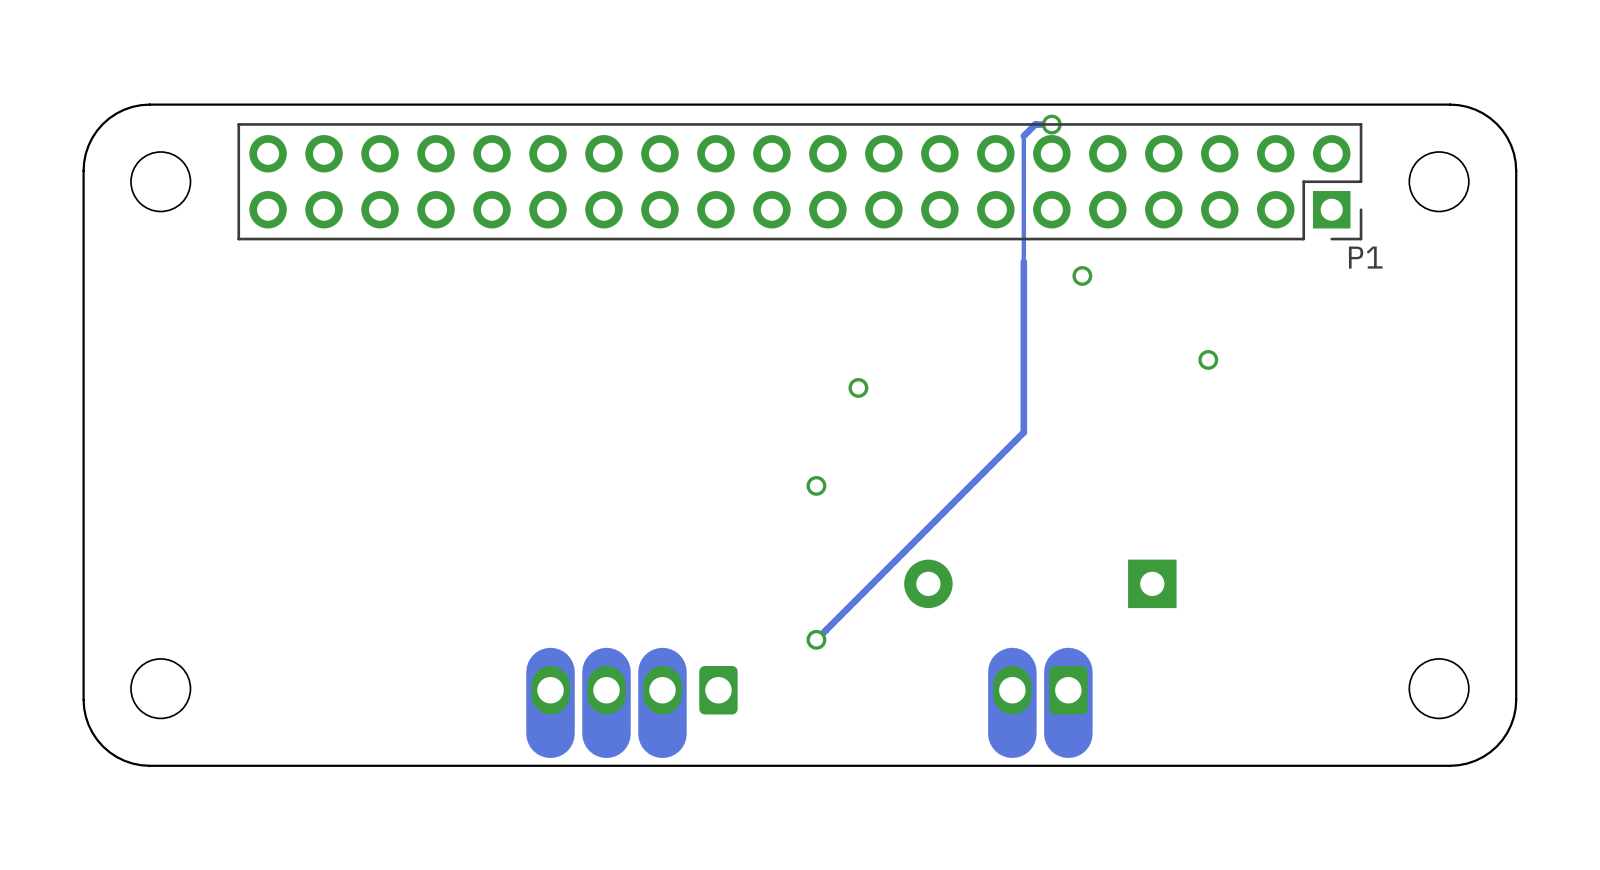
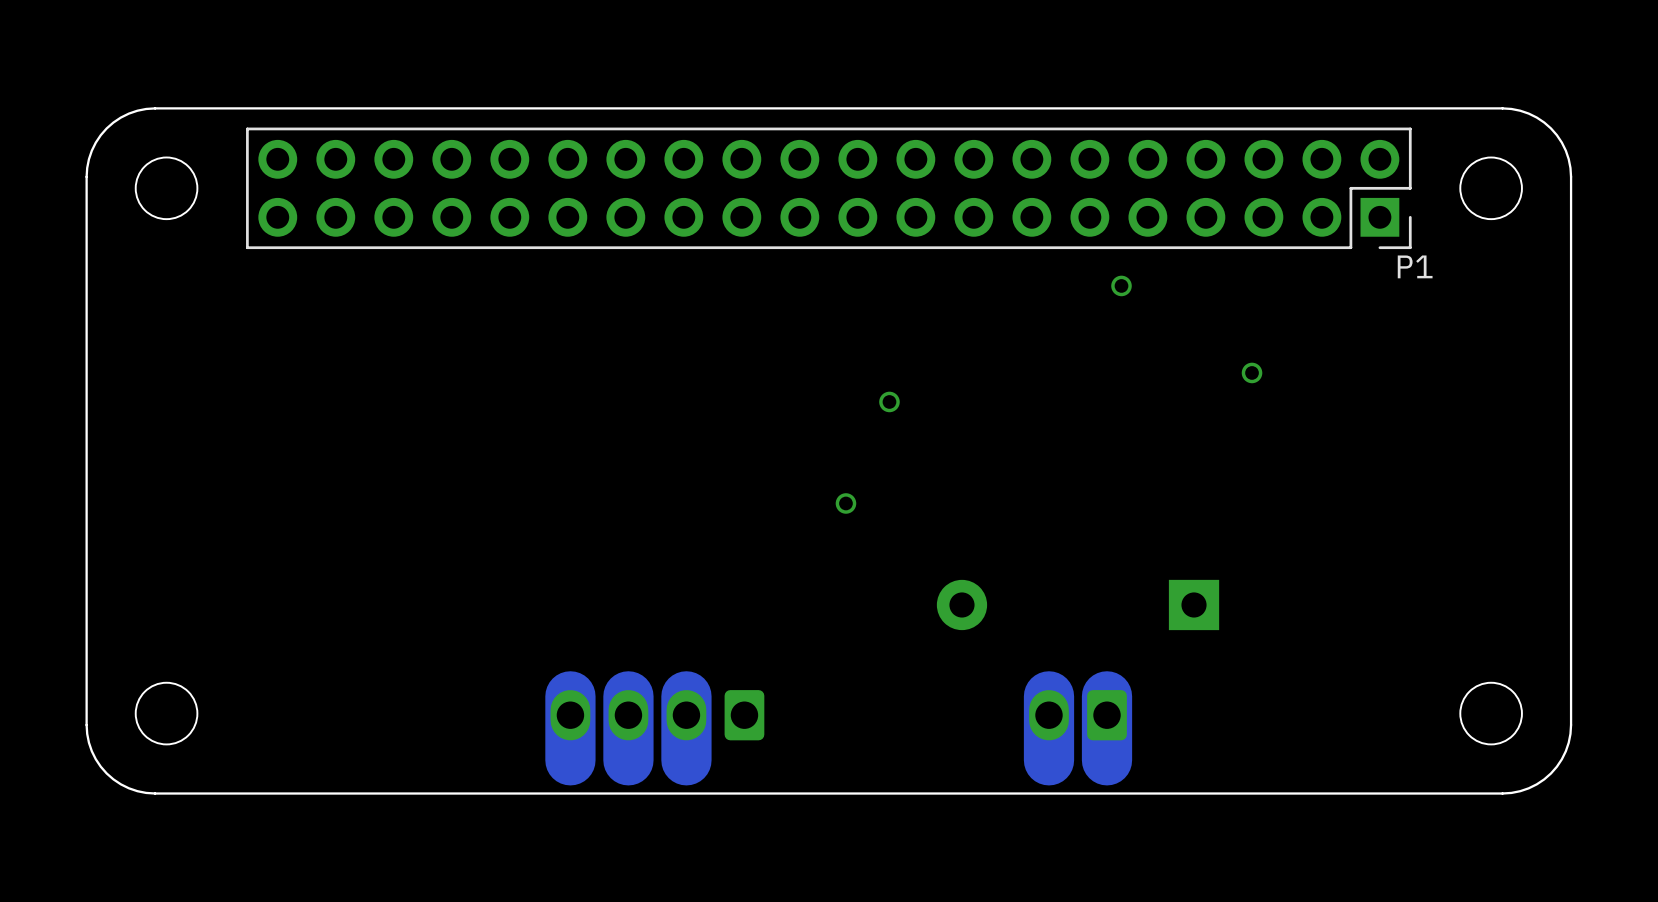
track: (1051, 124) (1035, 124) (1023, 136) (1023, 432) (816, 639) -> none
via: (1051, 124) -> none
via: (816, 639) -> none

